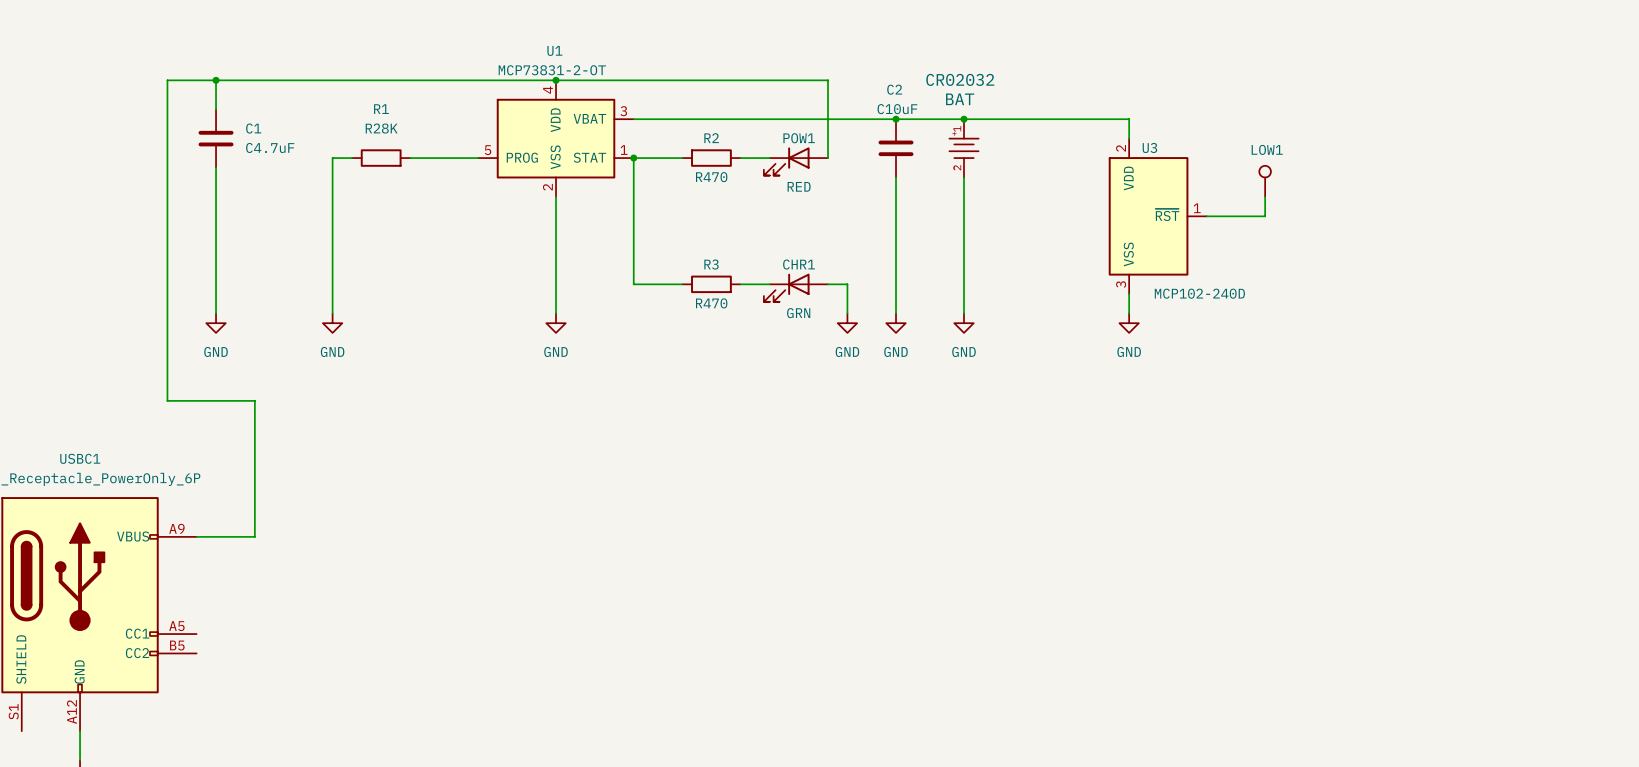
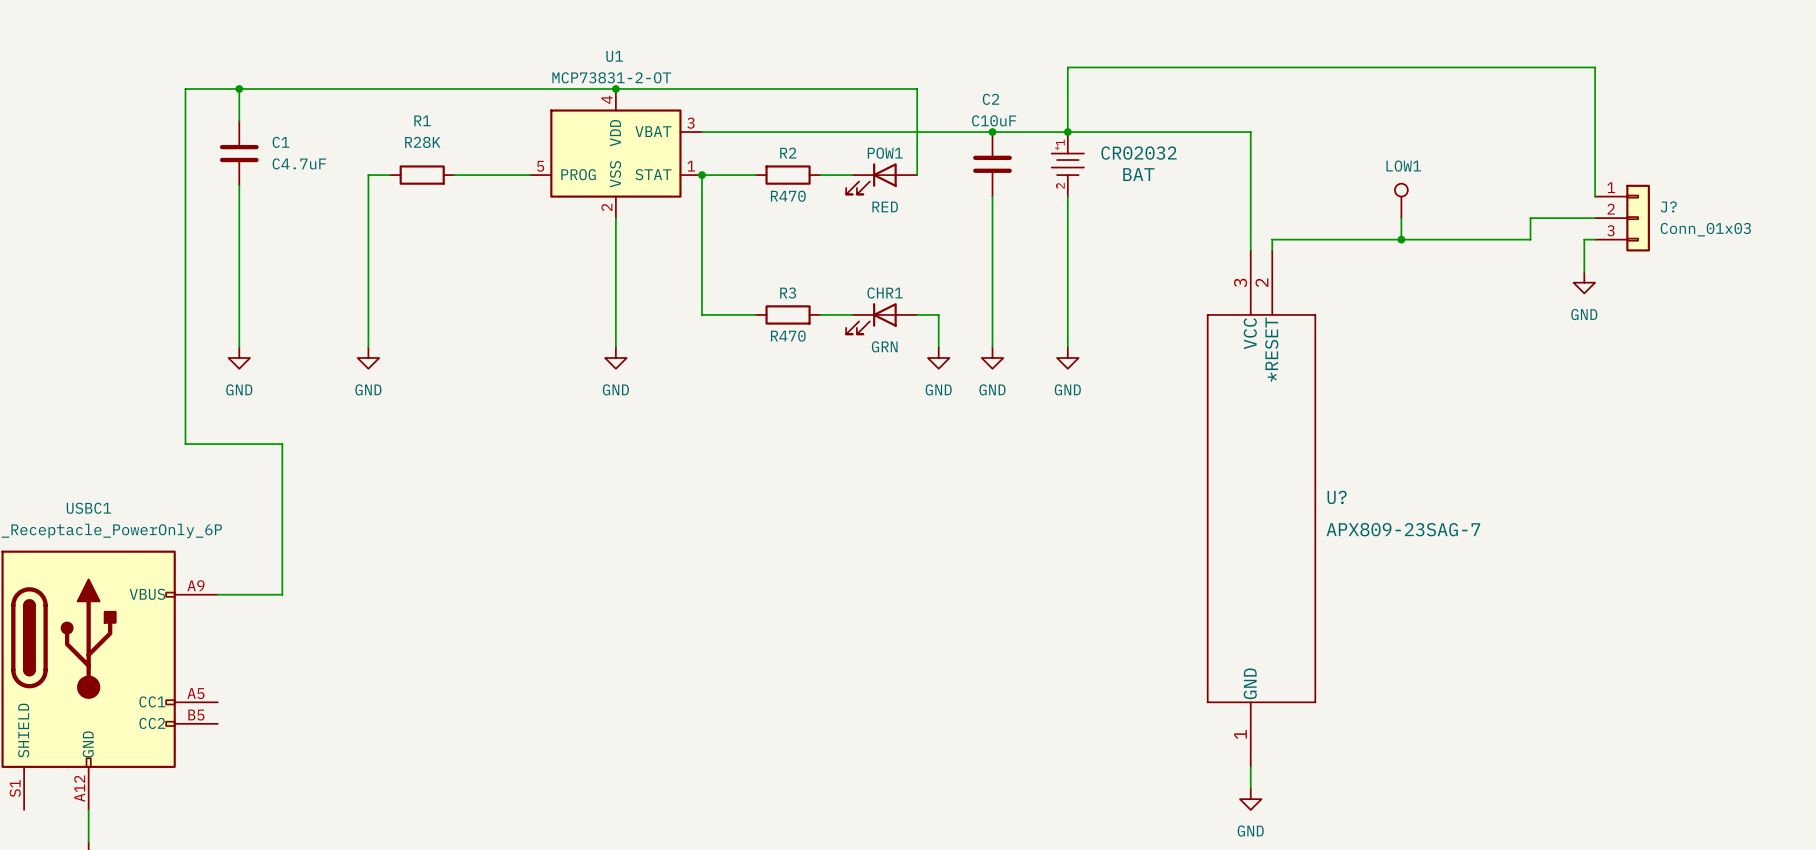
CR02032 name position: CR02032 (960, 79) -> CR02032 (1139, 153)
CR02032 text position: BAT (960, 99) -> BAT (1138, 174)
wire: none -> (1067, 132) (1067, 67) (1595, 67) (1595, 196)
wire: none -> (1595, 218) (1530, 218) (1530, 239) (1401, 239)
J?: none -> Conn_01x03 (1622, 218)
U3: MCP102-240D (1157, 216) -> none
junction: none -> (1401, 239)
wire: none -> (1595, 239) (1584, 239) (1584, 271)
power symbol: none -> GND (1584, 282)
wire: (1129, 294) (1129, 313) -> none
power symbol: GND (1129, 323) -> none
U?: none -> APX809-23SAG-7 (1261, 508)
wire: none -> (1250, 766) (1250, 788)
power symbol: none -> GND (1250, 799)

